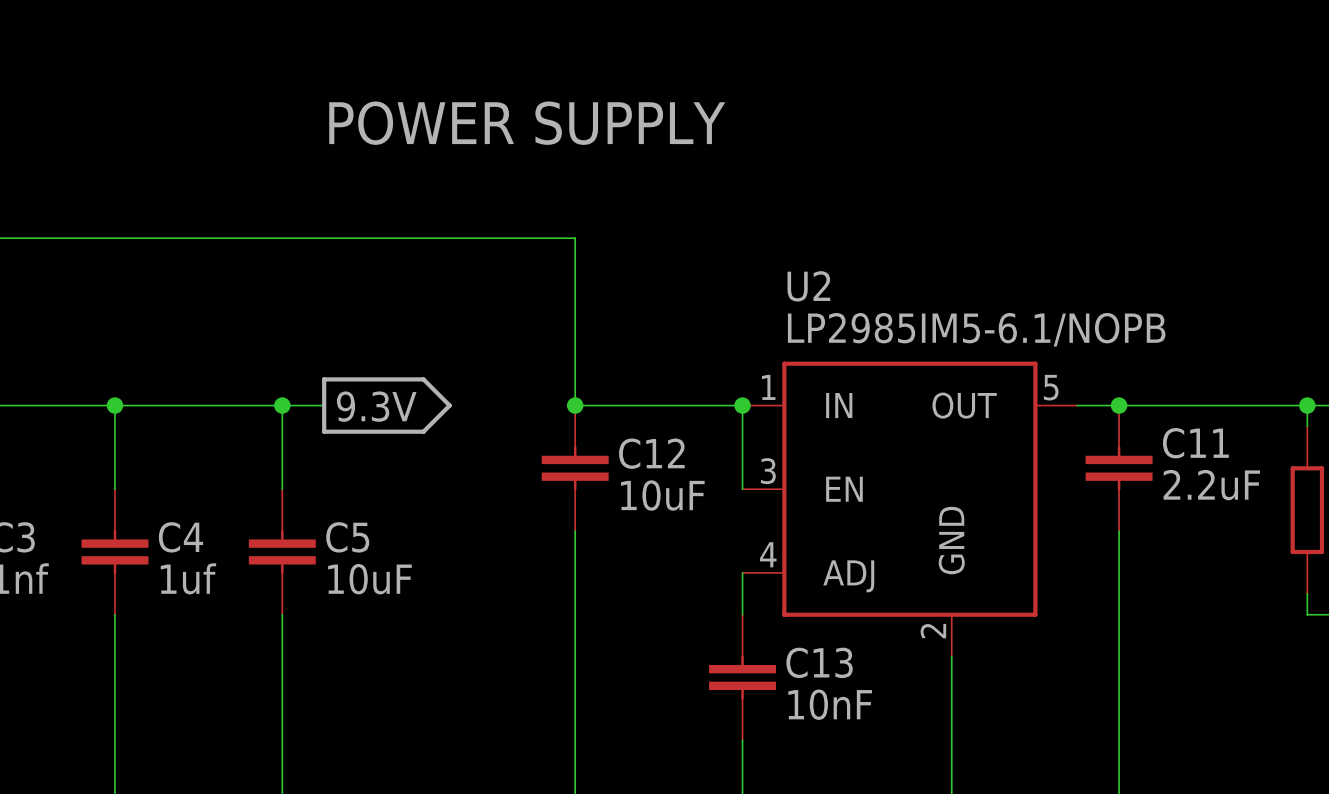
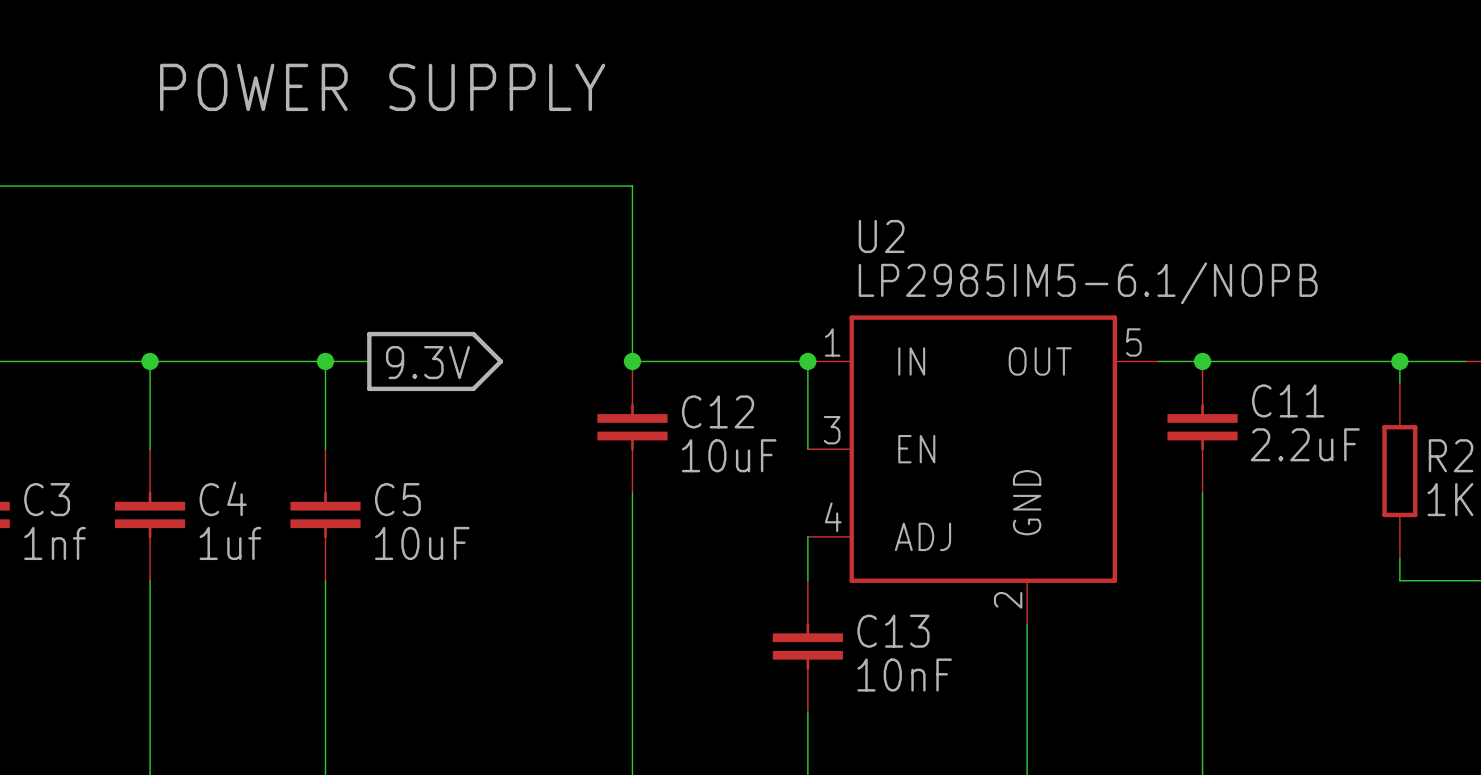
text position: POWER SUPPLY (527, 123) -> POWER SUPPLY (382, 87)

